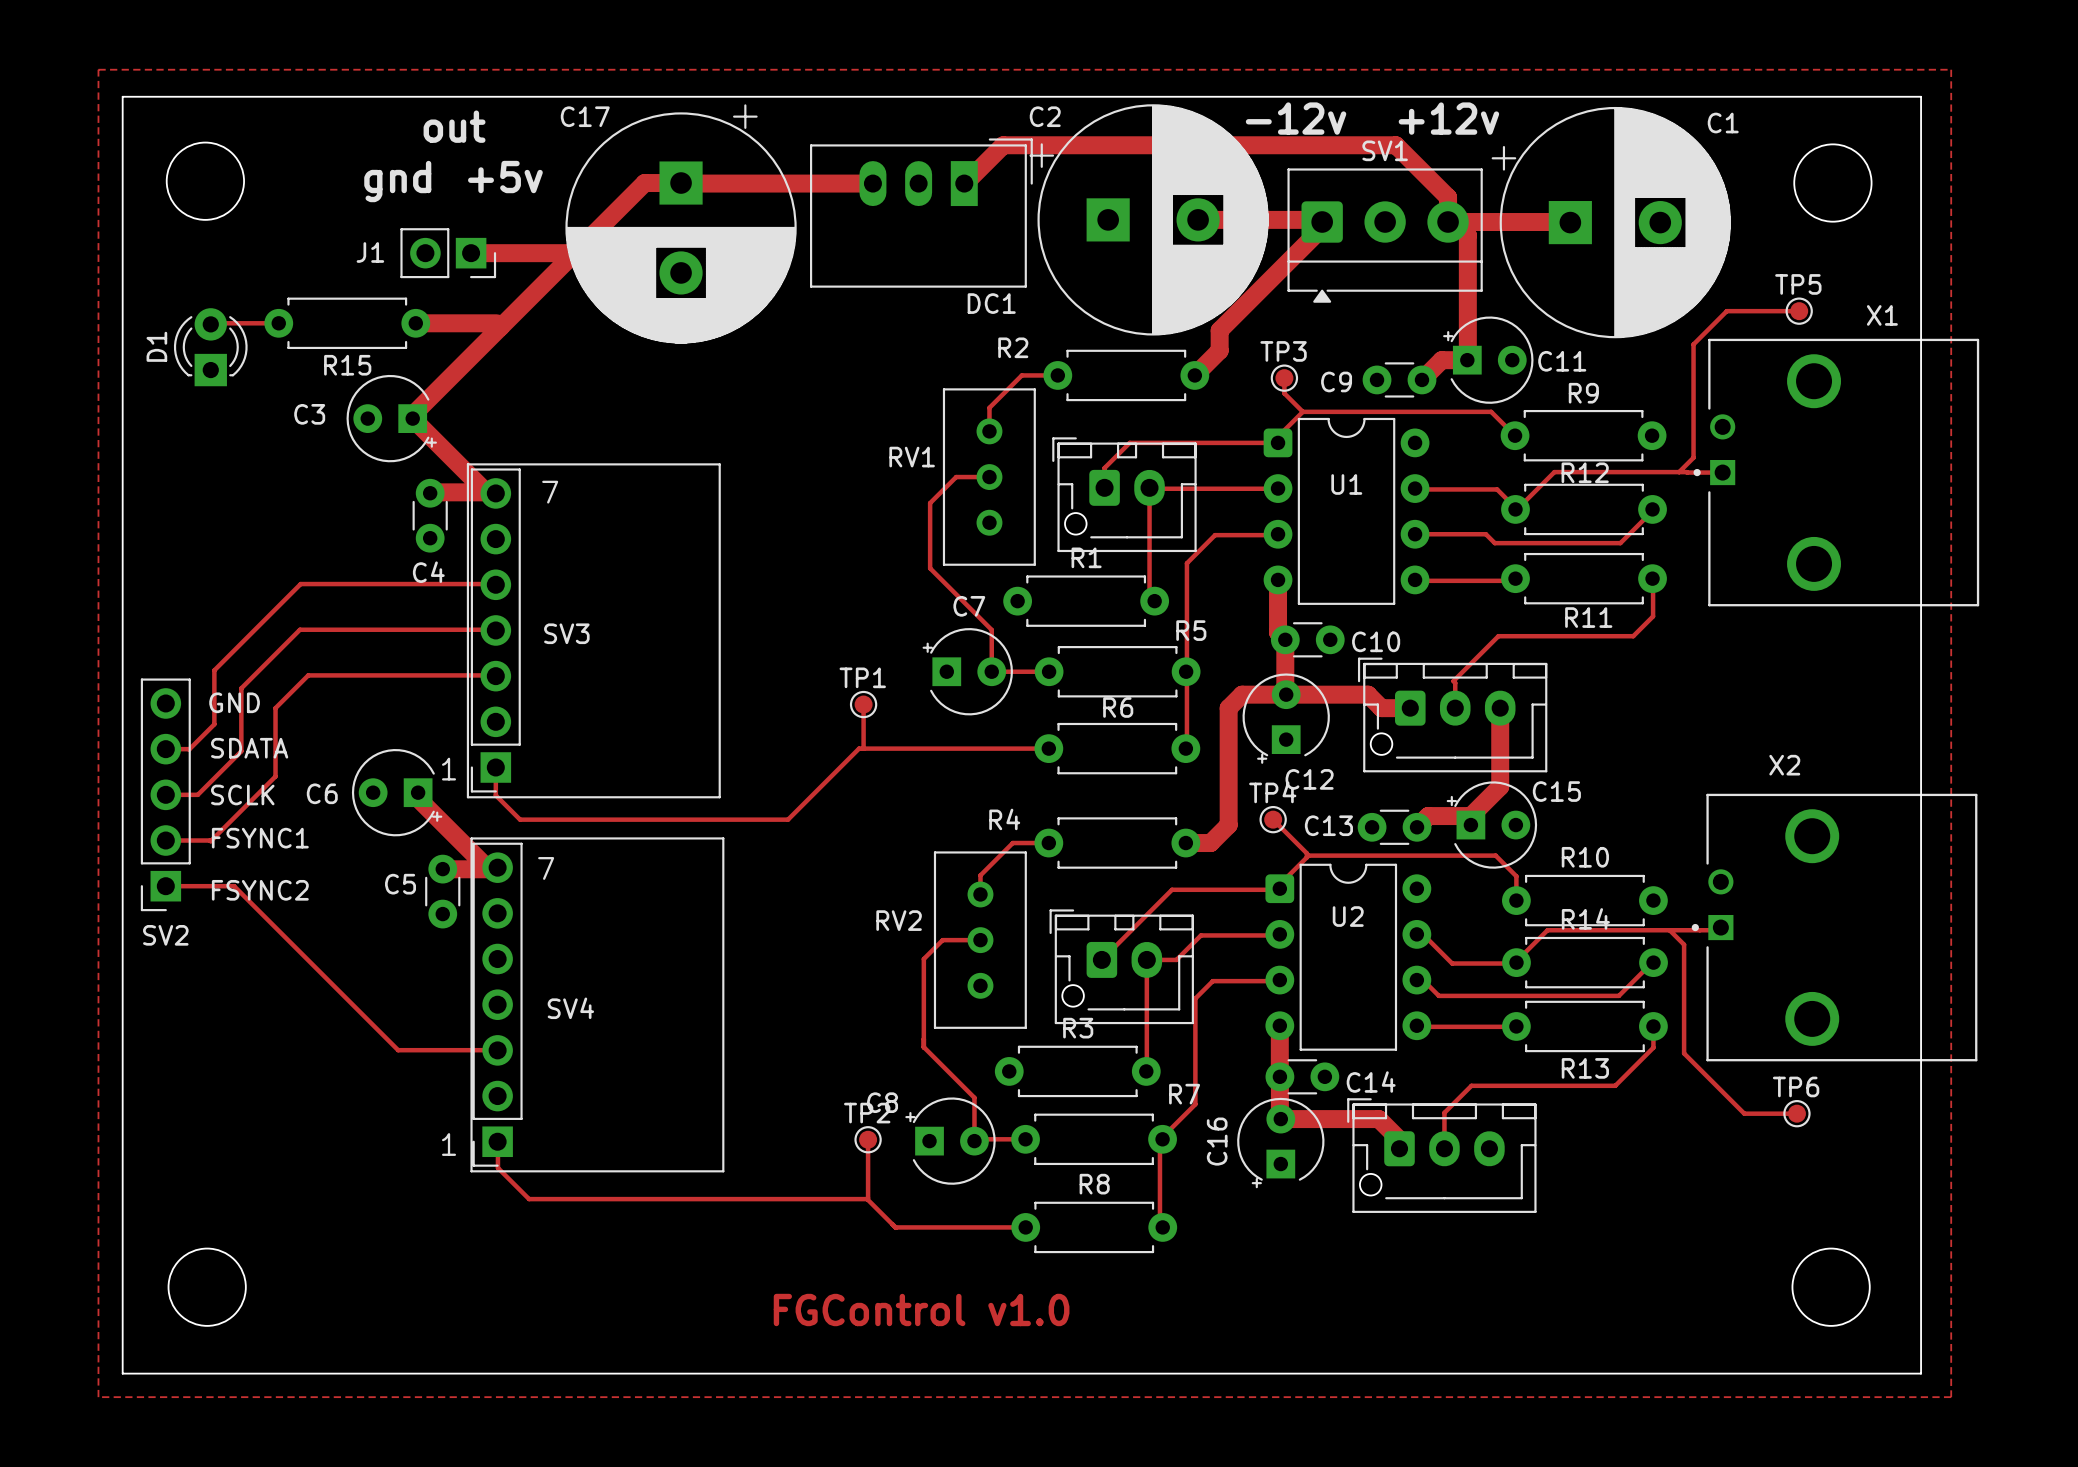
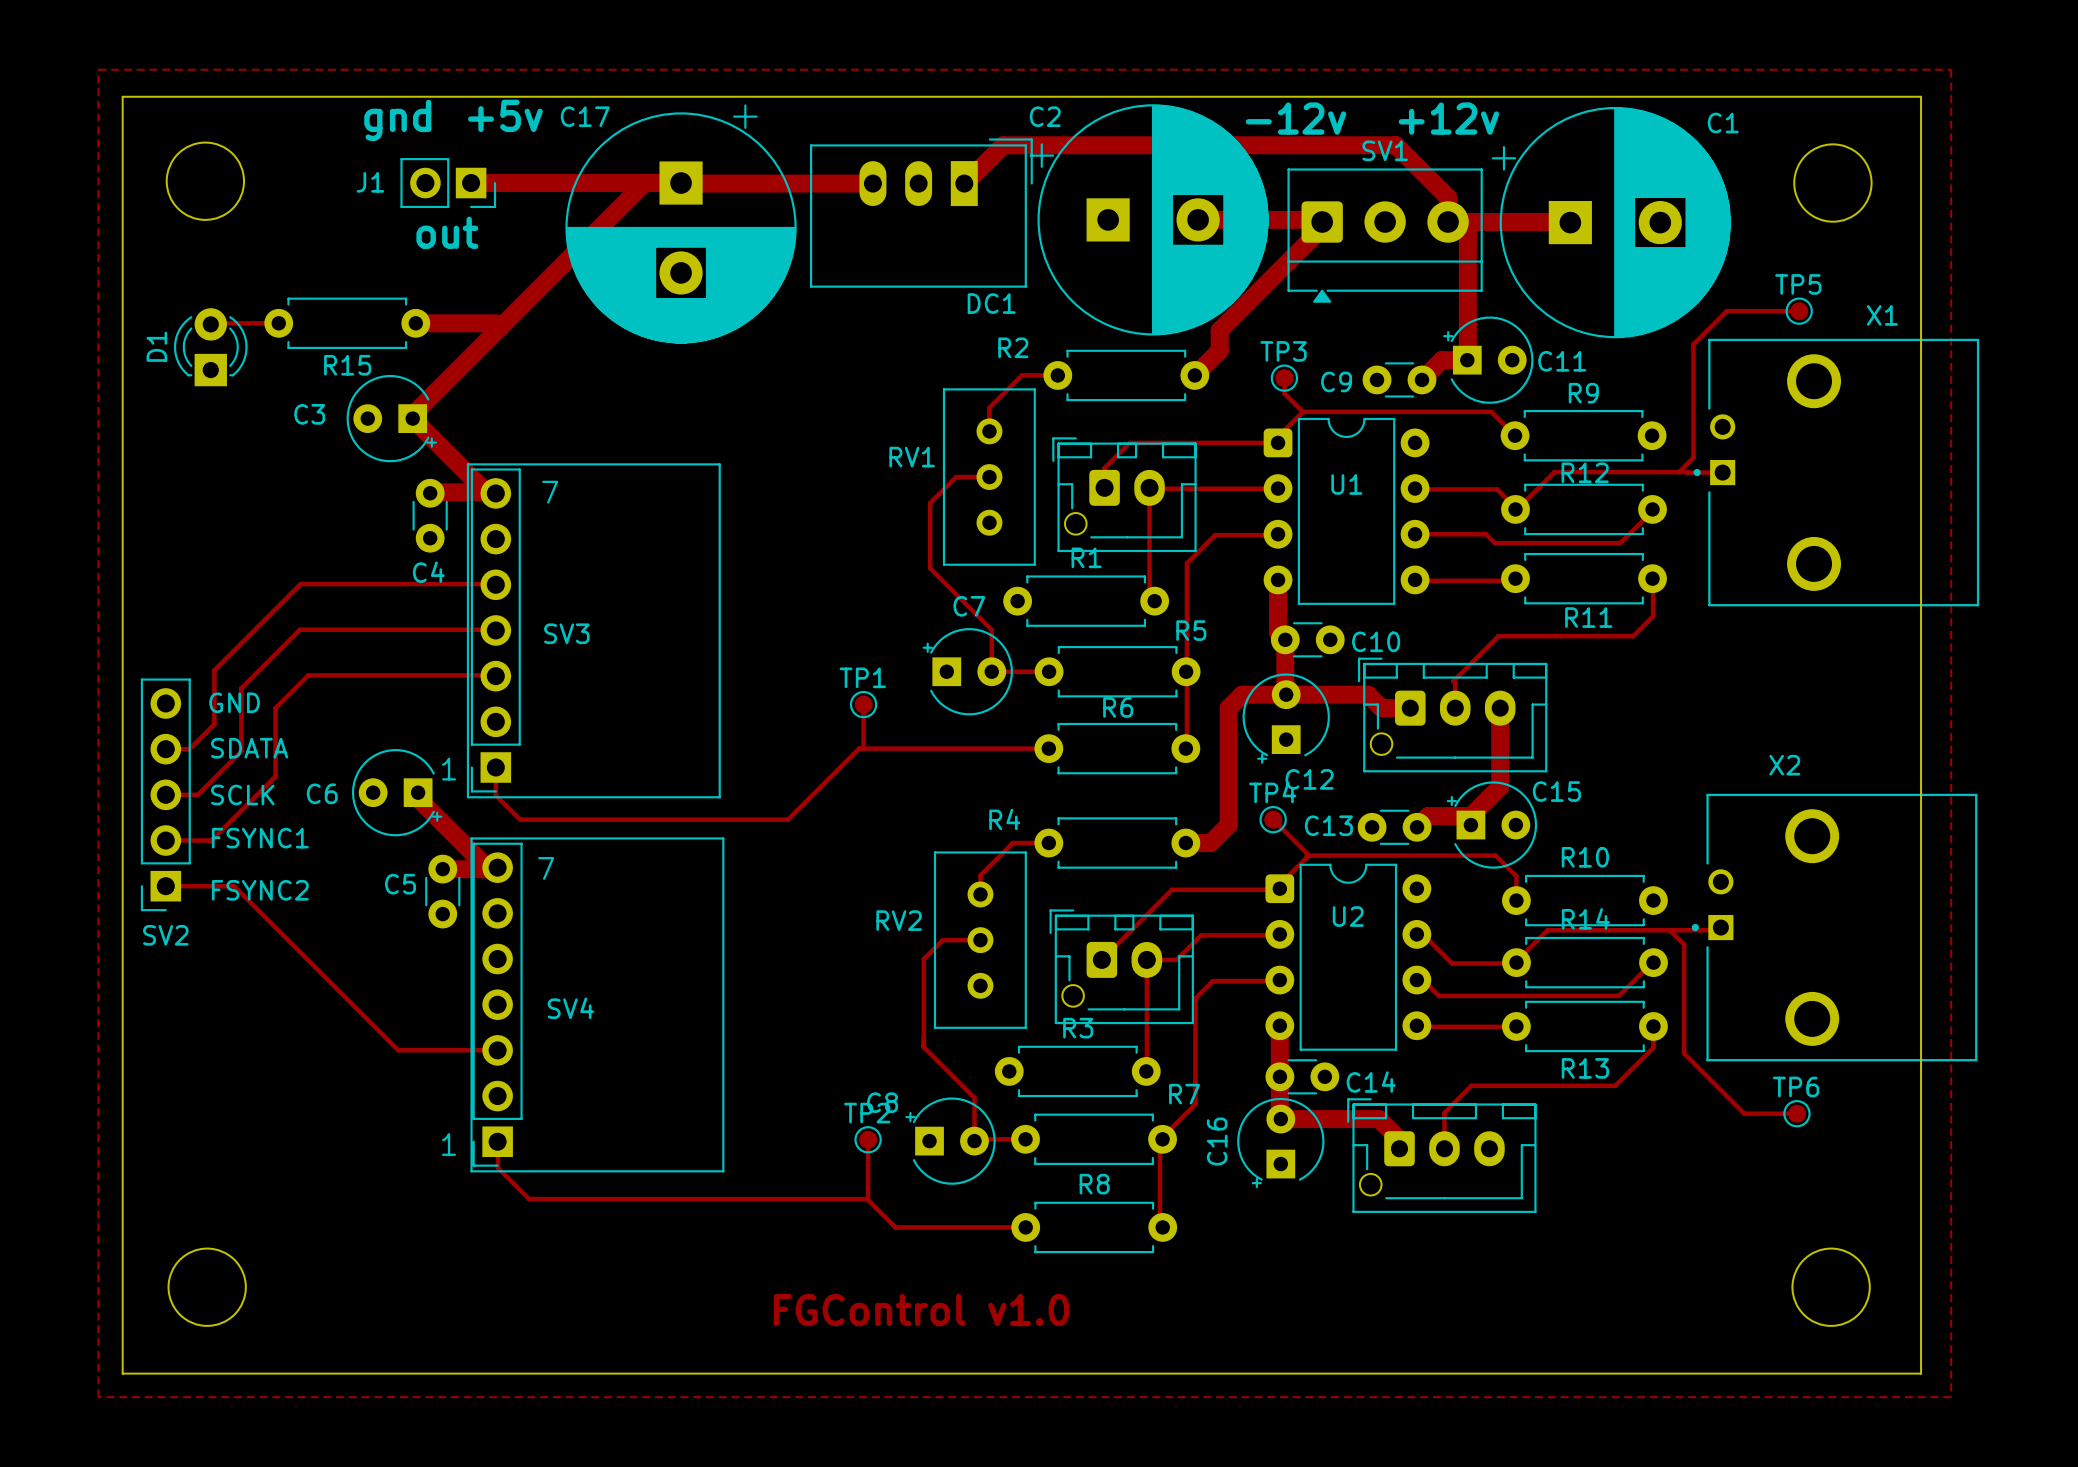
text position: out (454, 126) -> out (447, 232)
text position: +5v (505, 177) -> +5v (505, 115)
text position: gnd (397, 181) -> gnd (397, 120)
track: none -> (471, 183) (644, 183)
J1 position: (448, 253) -> (448, 183)
track: (471, 253) (574, 253) -> none

